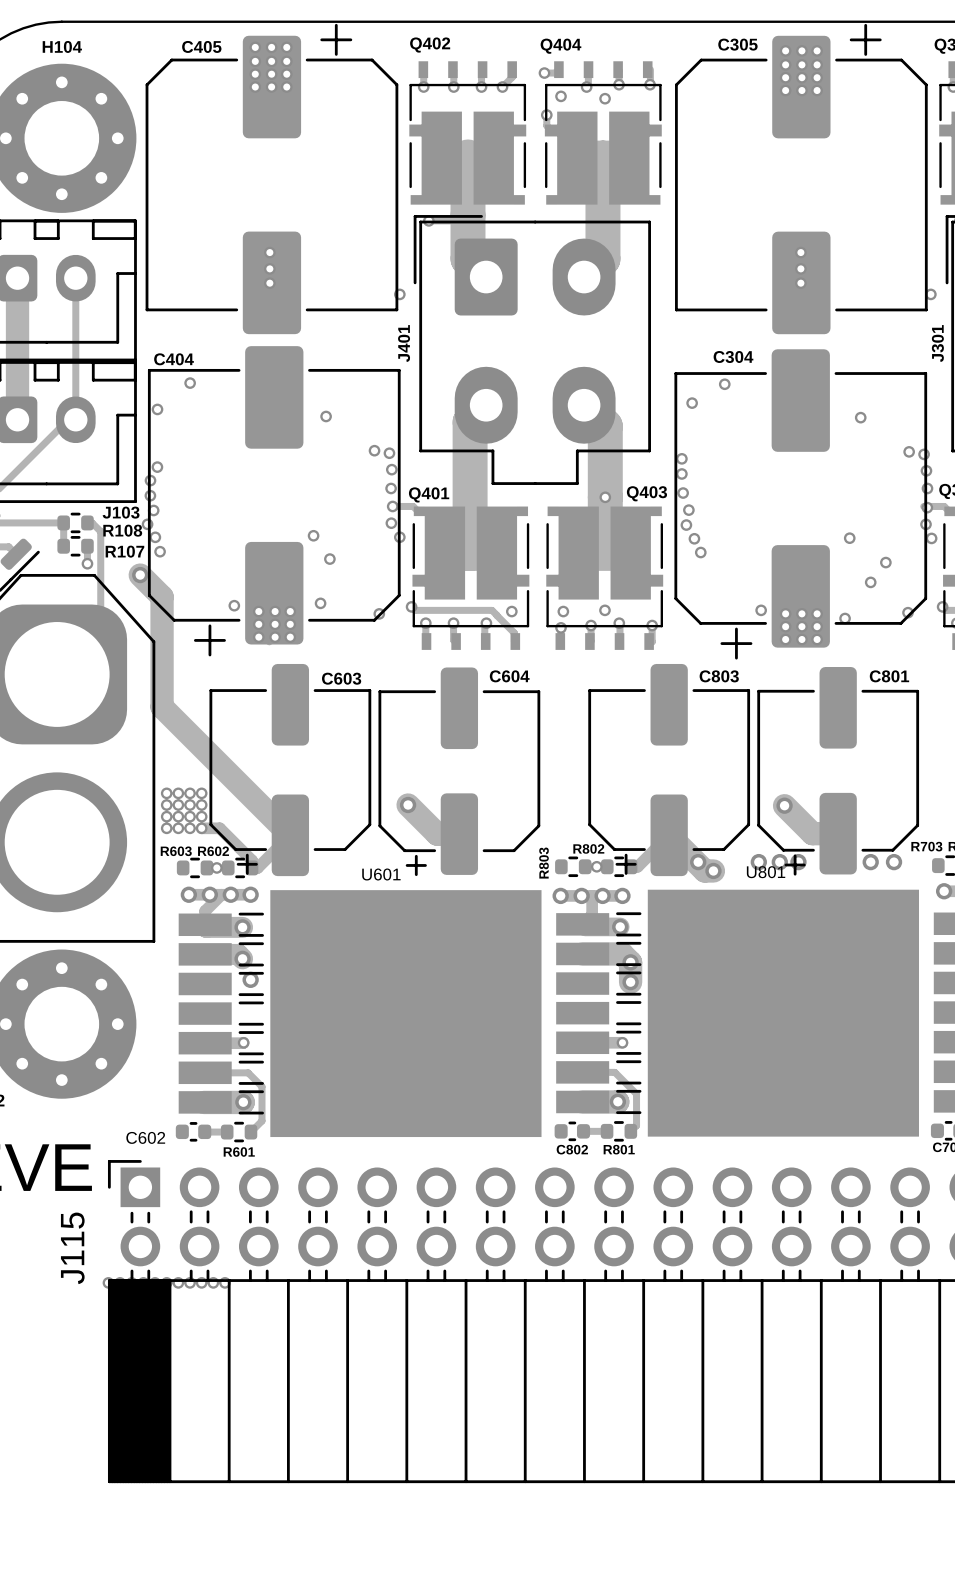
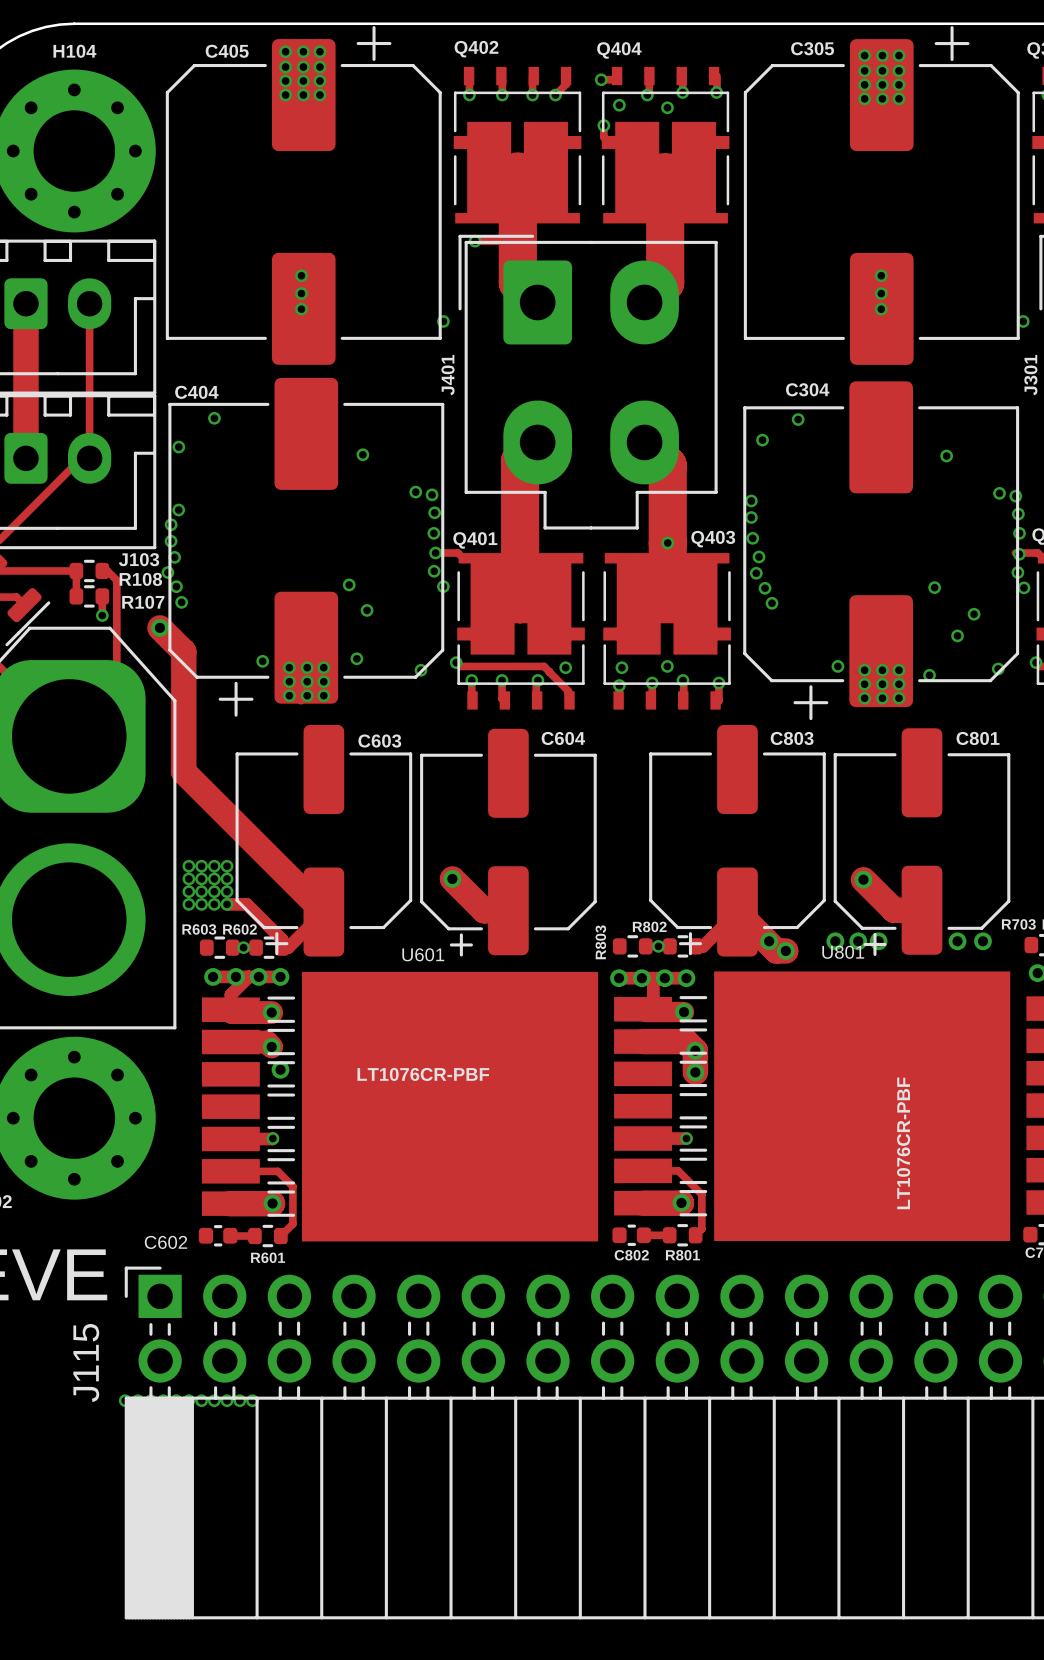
U601 value: none -> LT1076CR-PBF (423, 1074)
U801 value: none -> LT1076CR-PBF (903, 1143)

